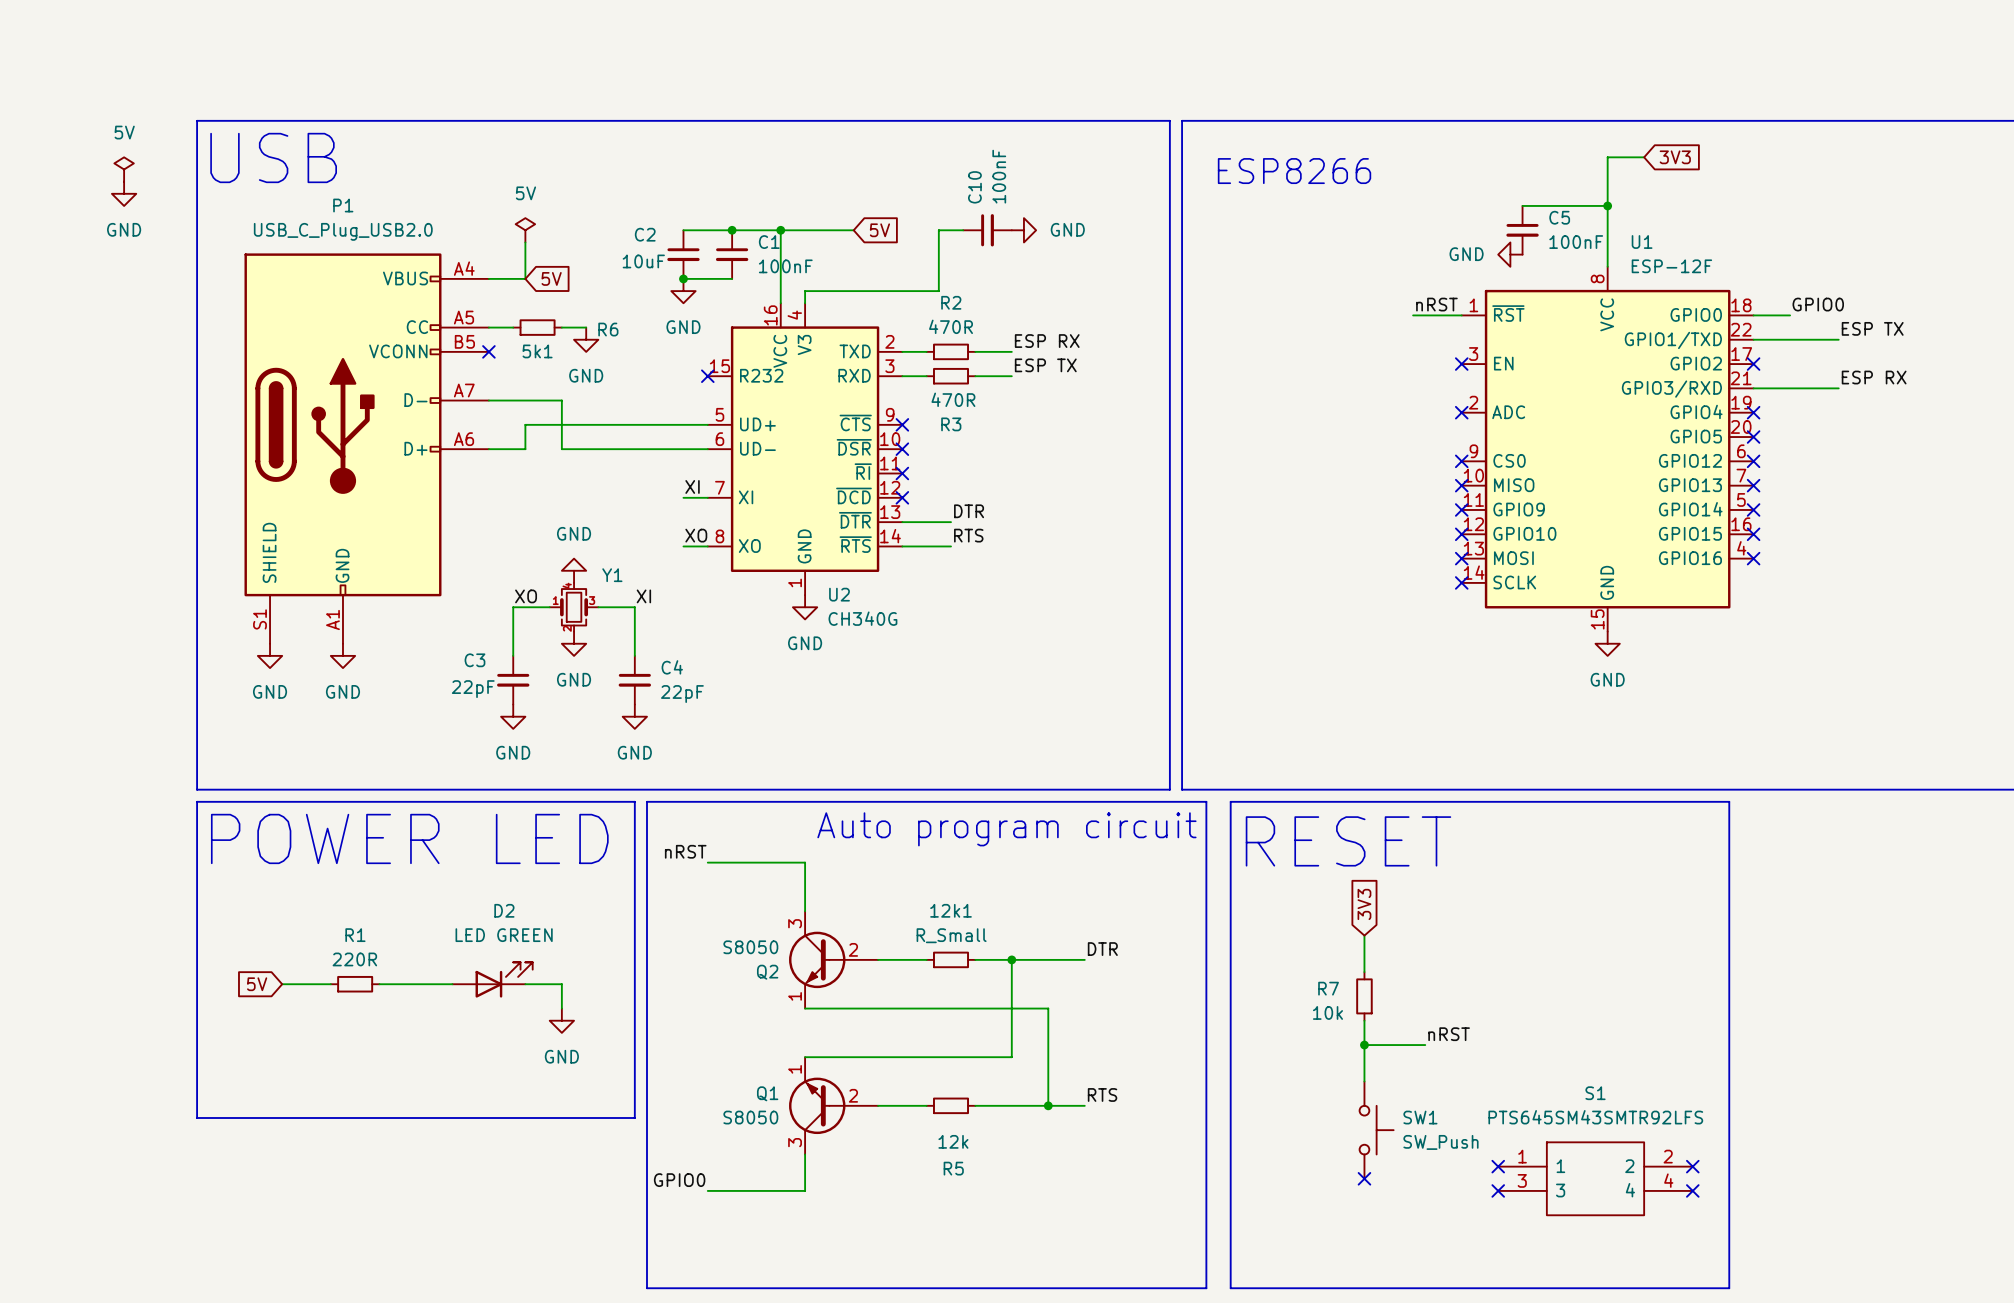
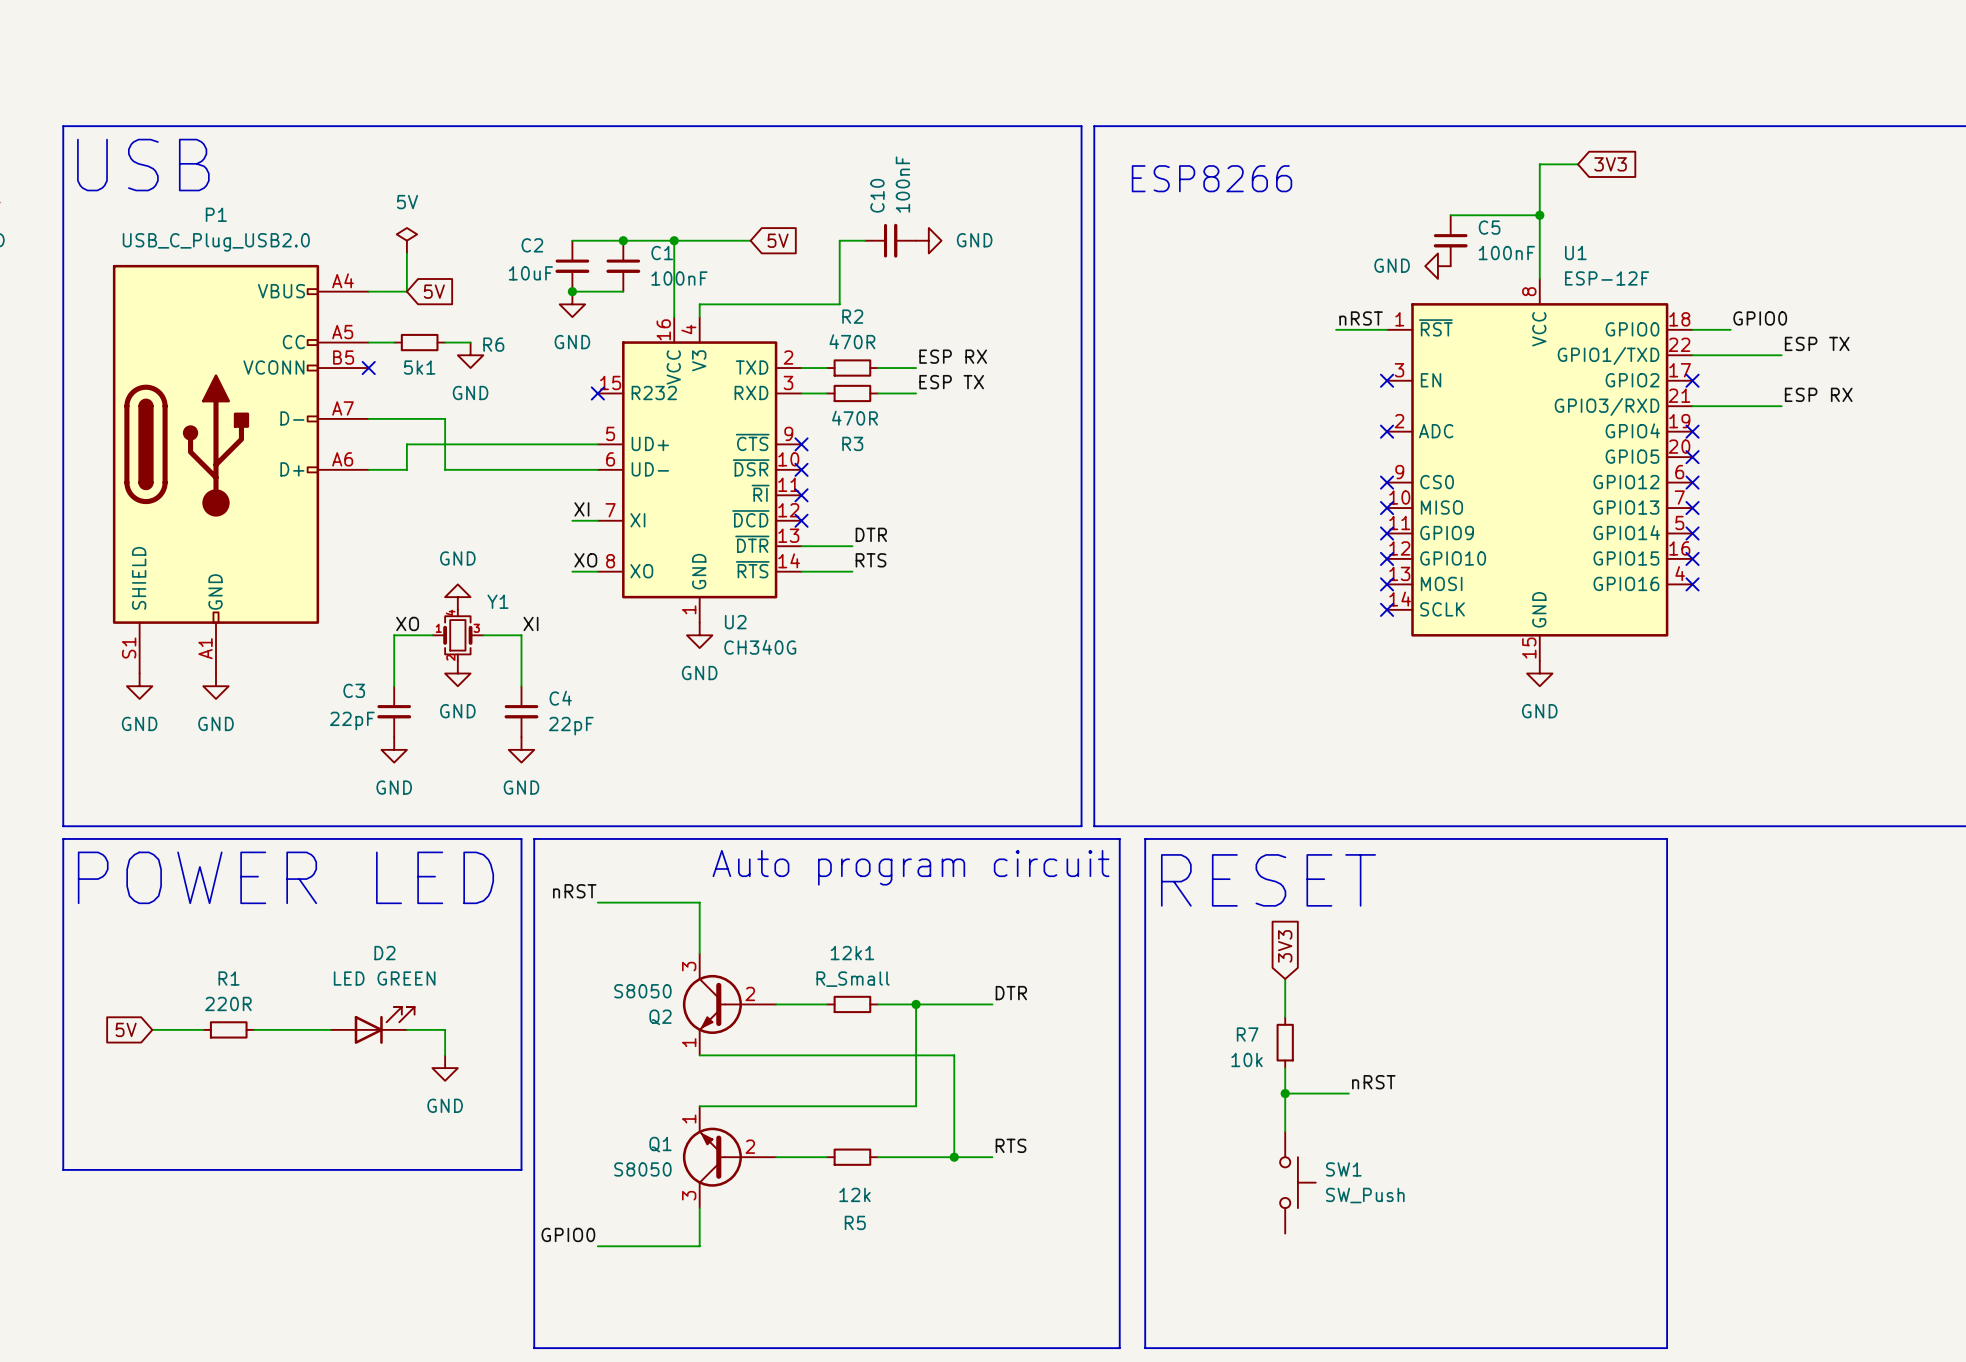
no-connect mark: (1498, 1166) -> none
no-connect mark: (1692, 1166) -> none
no-connect mark: (1364, 1178) -> none
S1: PTS645SM43SMTR92LFS (1595, 1178) -> none
no-connect mark: (1498, 1190) -> none
no-connect mark: (1692, 1190) -> none

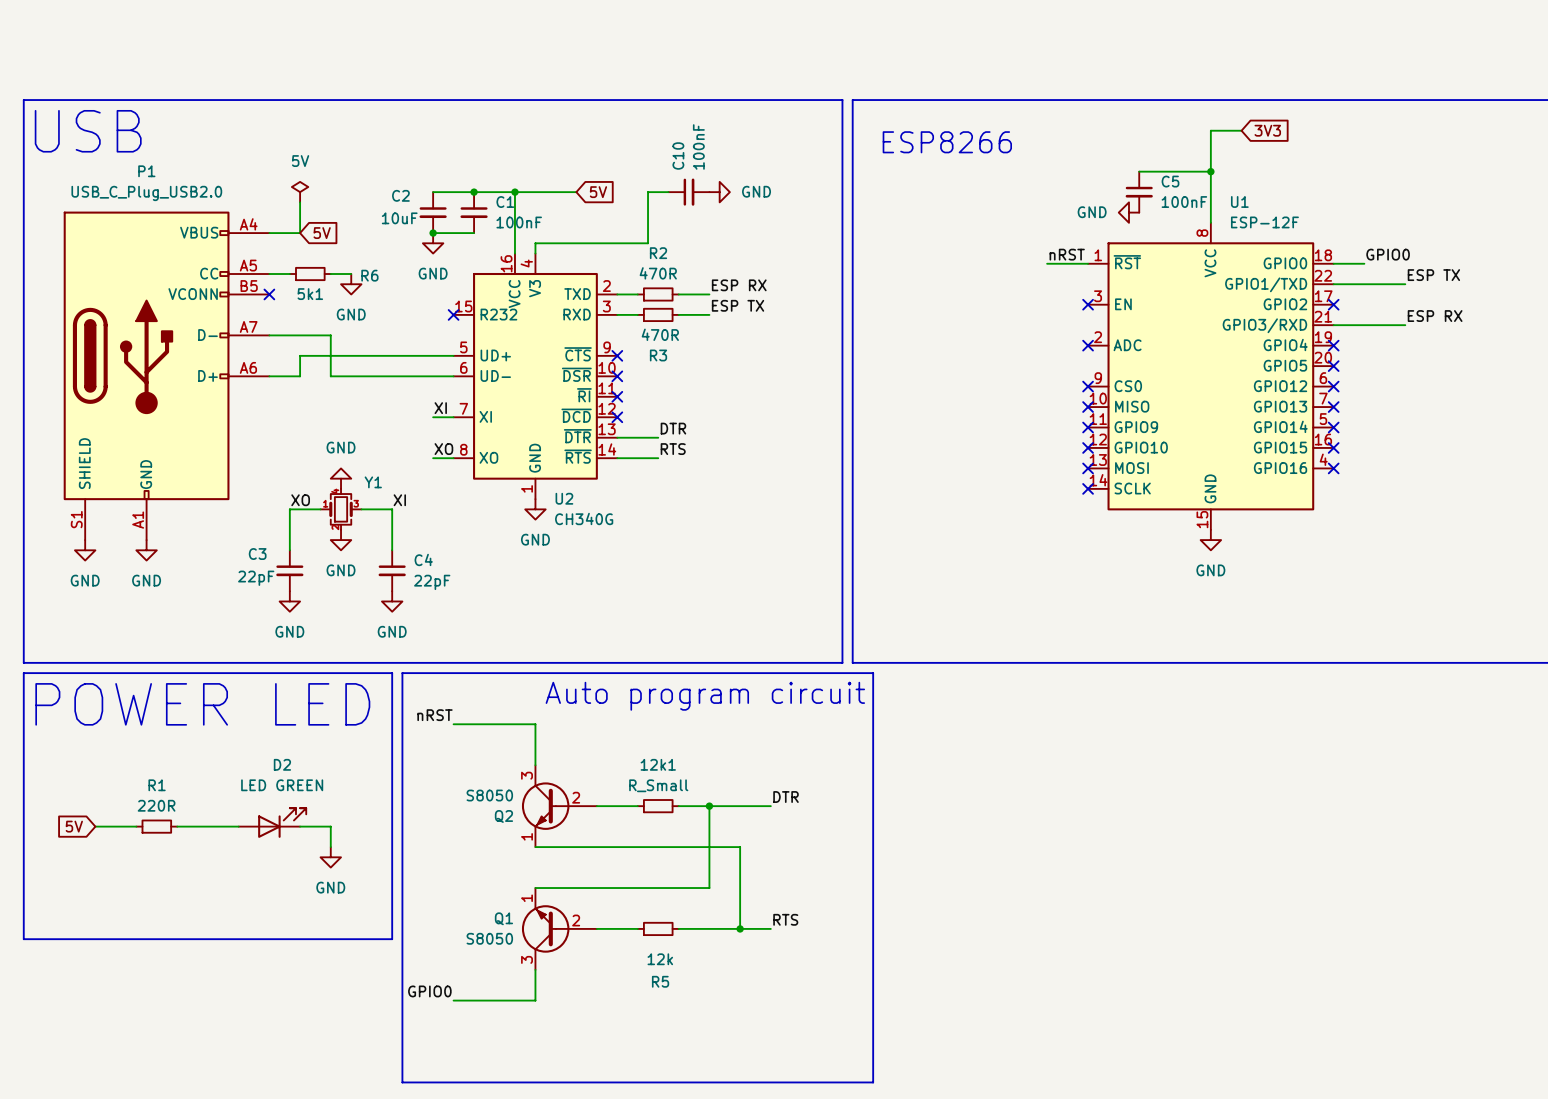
line: (1145, 838) (1667, 838) (1667, 1348) (1145, 1348) (1145, 838) -> none
text: RESET (1268, 880) -> none
global label: 3V3 (1285, 946) -> none
wire: (1285, 978) (1285, 1017) -> none
R7: 10k (1285, 1042) -> none
wire: (1285, 1068) (1285, 1131) -> none
label: nRST (1373, 1082) -> none
wire: (1285, 1093) (1348, 1093) -> none
junction: (1285, 1093) -> none
SW1: SW_Push (1297, 1182) -> none

